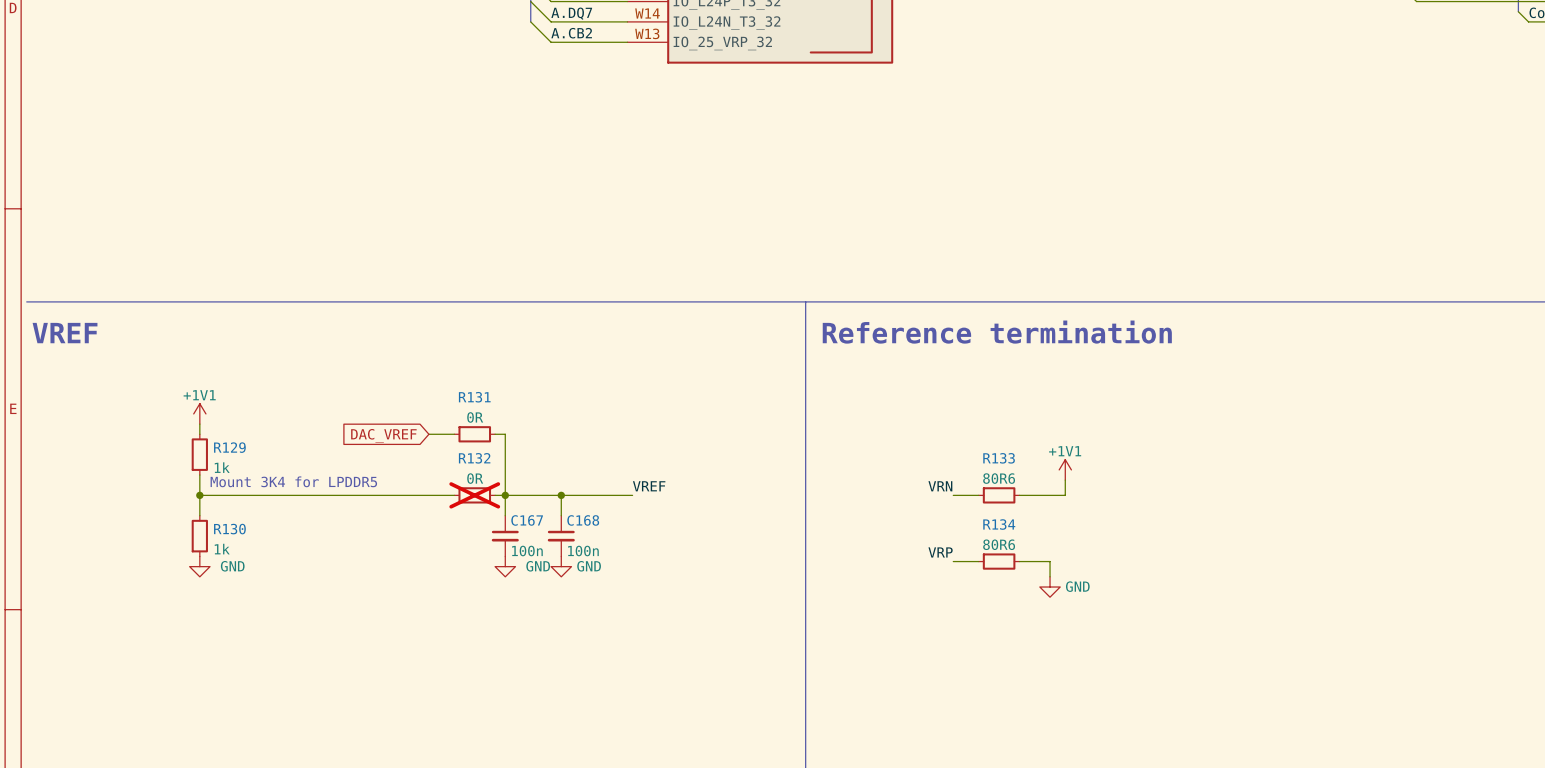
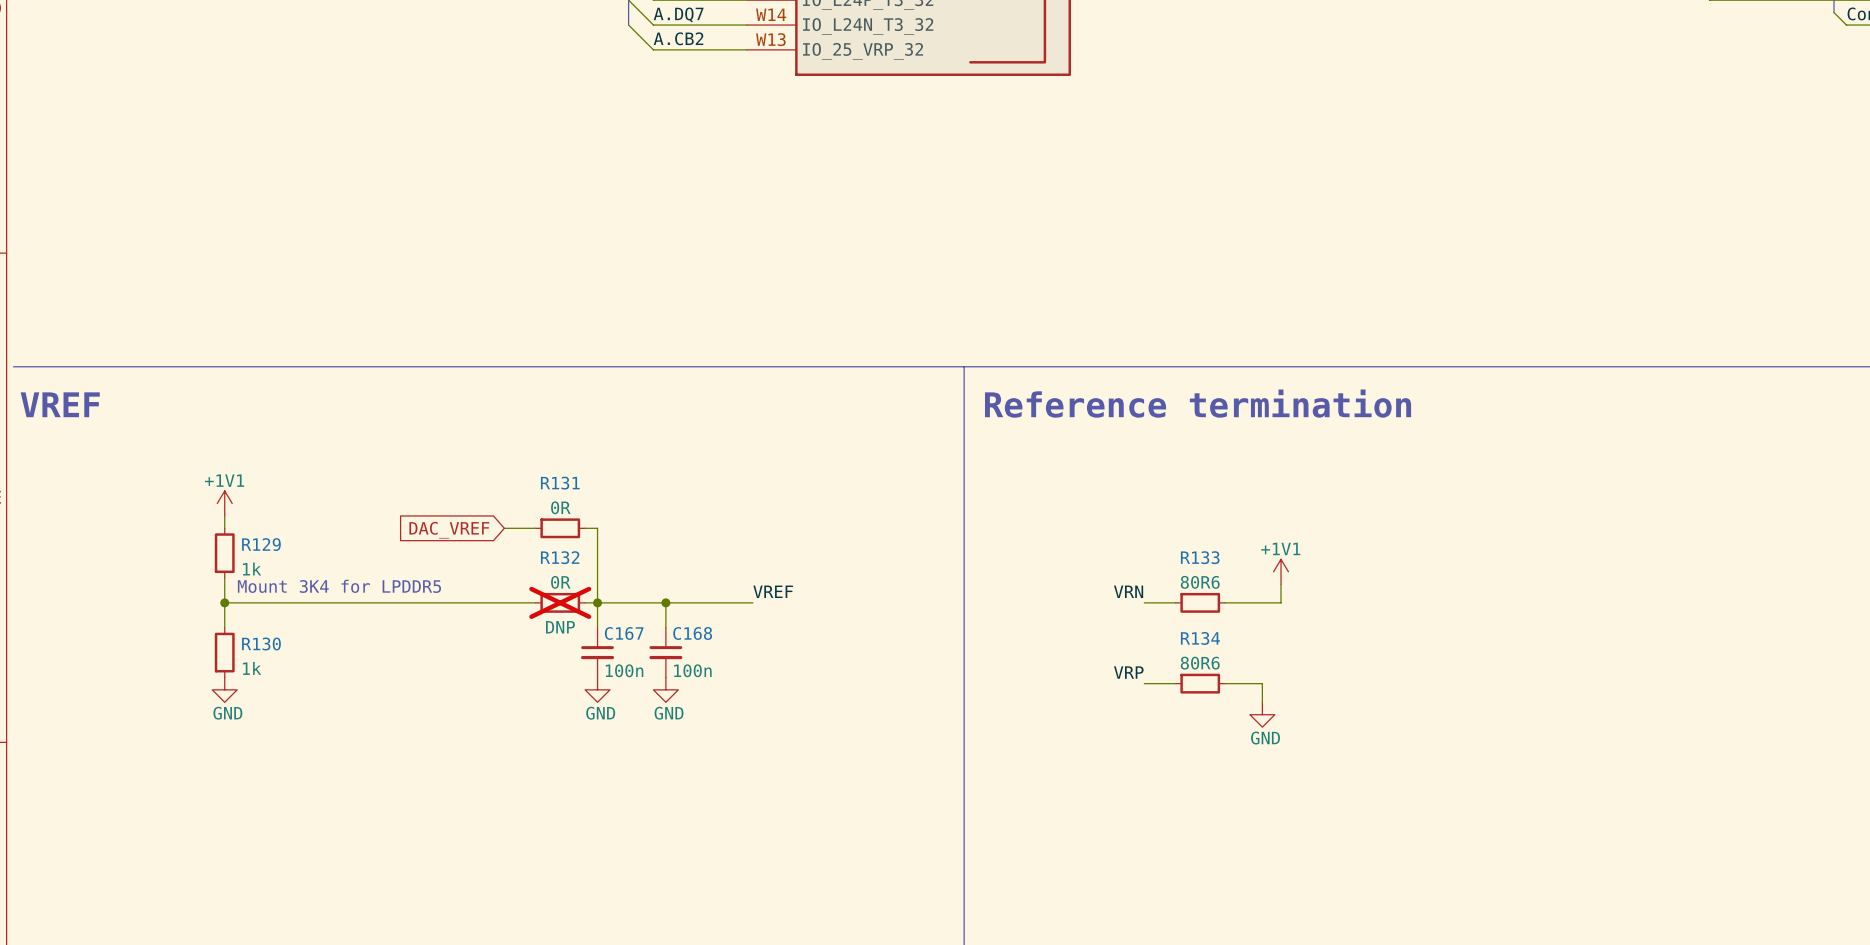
R132 text: none -> DNP (560, 627)
power symbol text position: GND (232, 566) -> GND (227, 713)
power symbol text position: GND (538, 566) -> GND (600, 713)
power symbol text position: GND (589, 566) -> GND (669, 713)
power symbol text position: GND (1077, 586) -> GND (1265, 738)

